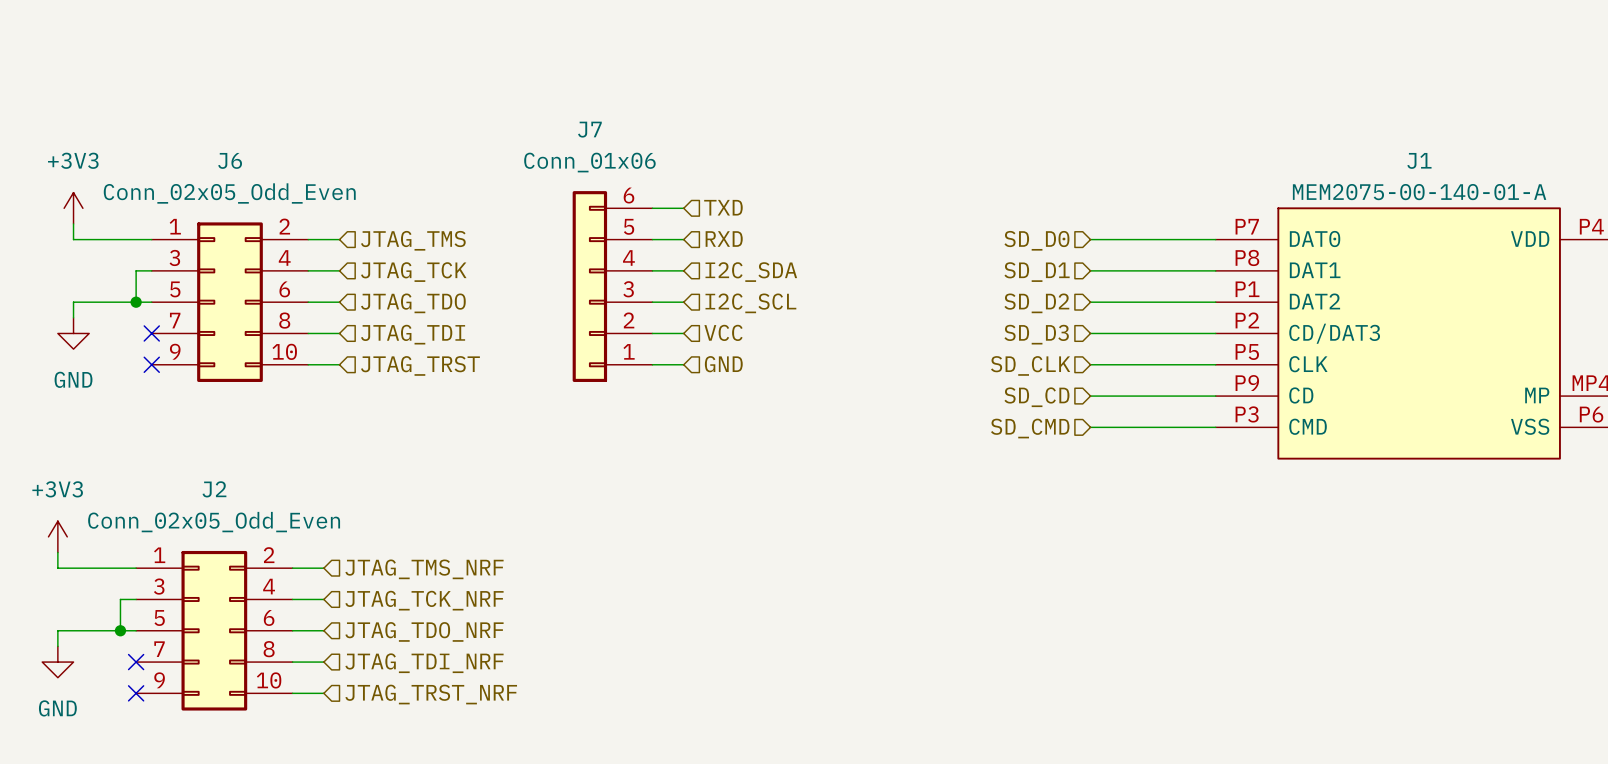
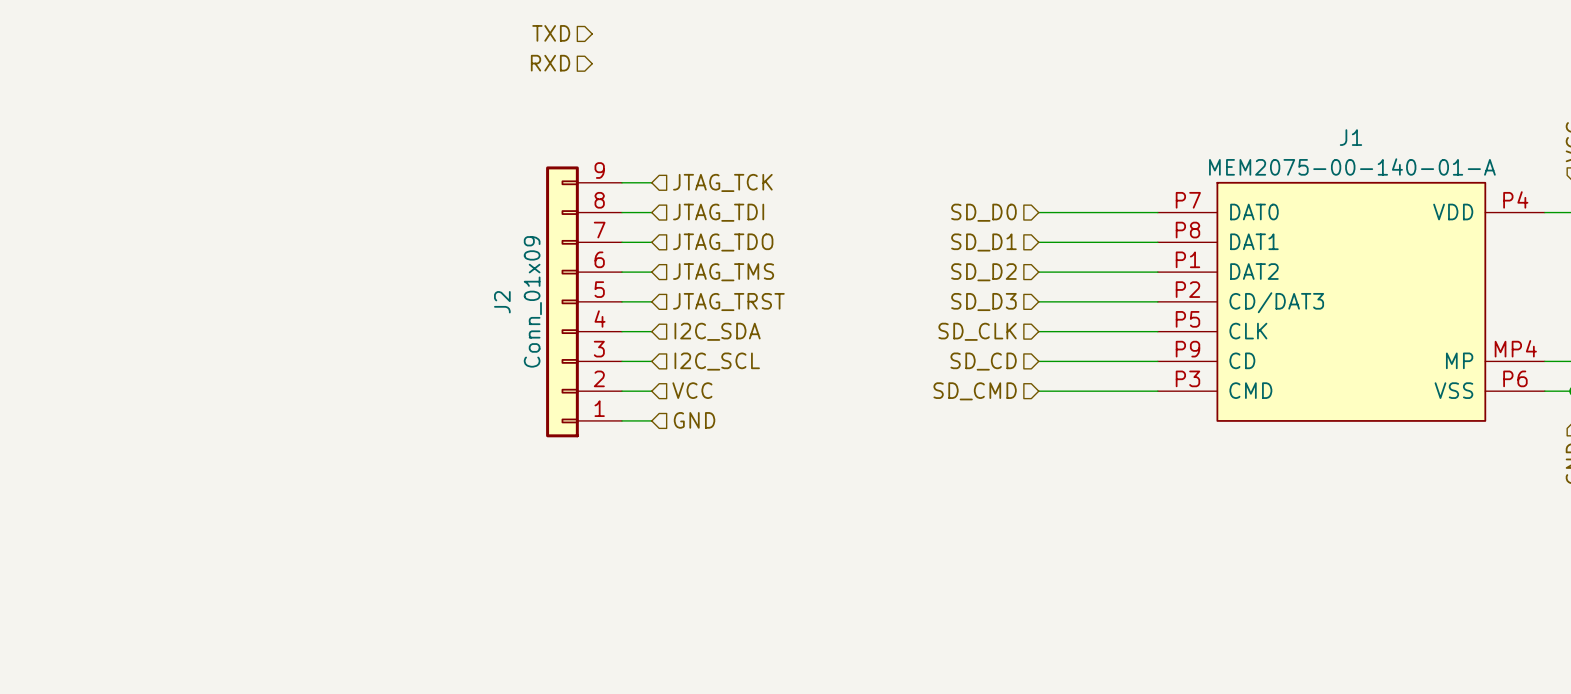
hierarchical label: none -> TXD (551, 33)
hierarchical label: none -> RXD (550, 63)
hierarchical label: TXD (723, 207) -> JTAG_TCK (722, 182)
power symbol: +3V3 (73, 208) -> none
wire: (73, 223) (73, 239) (151, 239) -> none
wire: (308, 239) (339, 239) -> none
hierarchical label: RXD (724, 239) -> JTAG_TDI (718, 212)
hierarchical label: JTAG_TMS (413, 240) -> none
wire: (151, 270) (136, 270) (136, 302) -> none
wire: (308, 270) (339, 270) -> none
hierarchical label: JTAG_TCK (413, 272) -> none
hierarchical label: I2C_SDA (751, 272) -> JTAG_TDO (723, 242)
J7: Conn_01x06 (612, 286) -> none
junction: (136, 302) -> none
wire: (151, 302) (73, 302) (73, 317) -> none
J6: Conn_02x05_Odd_Even (229, 302) -> none
wire: (308, 302) (339, 302) -> none
hierarchical label: JTAG_TDO (413, 303) -> none
hierarchical label: I2C_SCL (750, 303) -> JTAG_TMS (723, 272)
hierarchical label: VCC (723, 332) -> JTAG_TRST (728, 302)
power symbol: GND (73, 333) -> none
no-connect mark: (151, 333) -> none
wire: (308, 333) (339, 333) -> none
hierarchical label: JTAG_TDI (413, 334) -> none
no-connect mark: (151, 364) -> none
wire: (308, 364) (339, 364) -> none
hierarchical label: GND (723, 364) -> I2C_SDA (717, 331)
hierarchical label: JTAG_TRST (420, 365) -> none
wire: none -> (621, 361) (651, 361)
hierarchical label: none -> I2C_SCL (717, 361)
hierarchical label: none -> VCC (692, 390)
wire: none -> (621, 391) (651, 391)
wire: none -> (621, 420) (651, 420)
hierarchical label: none -> GND (694, 420)
J2 name position: J2 (214, 489) -> J2 (502, 302)
J2 value: Conn_02x05_Odd_Even (214, 522) -> Conn_01x09 (532, 301)
power symbol: +3V3 (57, 536) -> none
J2 symbol: [136, 550, 293, 711] -> [546, 166, 622, 438]
wire: (57, 552) (57, 568) (136, 568) -> none
wire: (292, 568) (323, 568) -> none
hierarchical label: JTAG_TMS_NRF (424, 569) -> none
wire: (136, 599) (120, 599) (120, 630) -> none
wire: (292, 599) (323, 599) -> none
hierarchical label: JTAG_TCK_NRF (424, 600) -> none
junction: (120, 630) -> none
wire: (136, 630) (57, 630) (57, 646) -> none
wire: (292, 630) (323, 630) -> none
hierarchical label: JTAG_TDO_NRF (424, 631) -> none
power symbol: GND (57, 662) -> none
no-connect mark: (136, 662) -> none
wire: (292, 662) (323, 662) -> none
hierarchical label: JTAG_TDI_NRF (424, 663) -> none
no-connect mark: (136, 693) -> none
wire: (292, 693) (323, 693) -> none
hierarchical label: JTAG_TRST_NRF (431, 694) -> none

